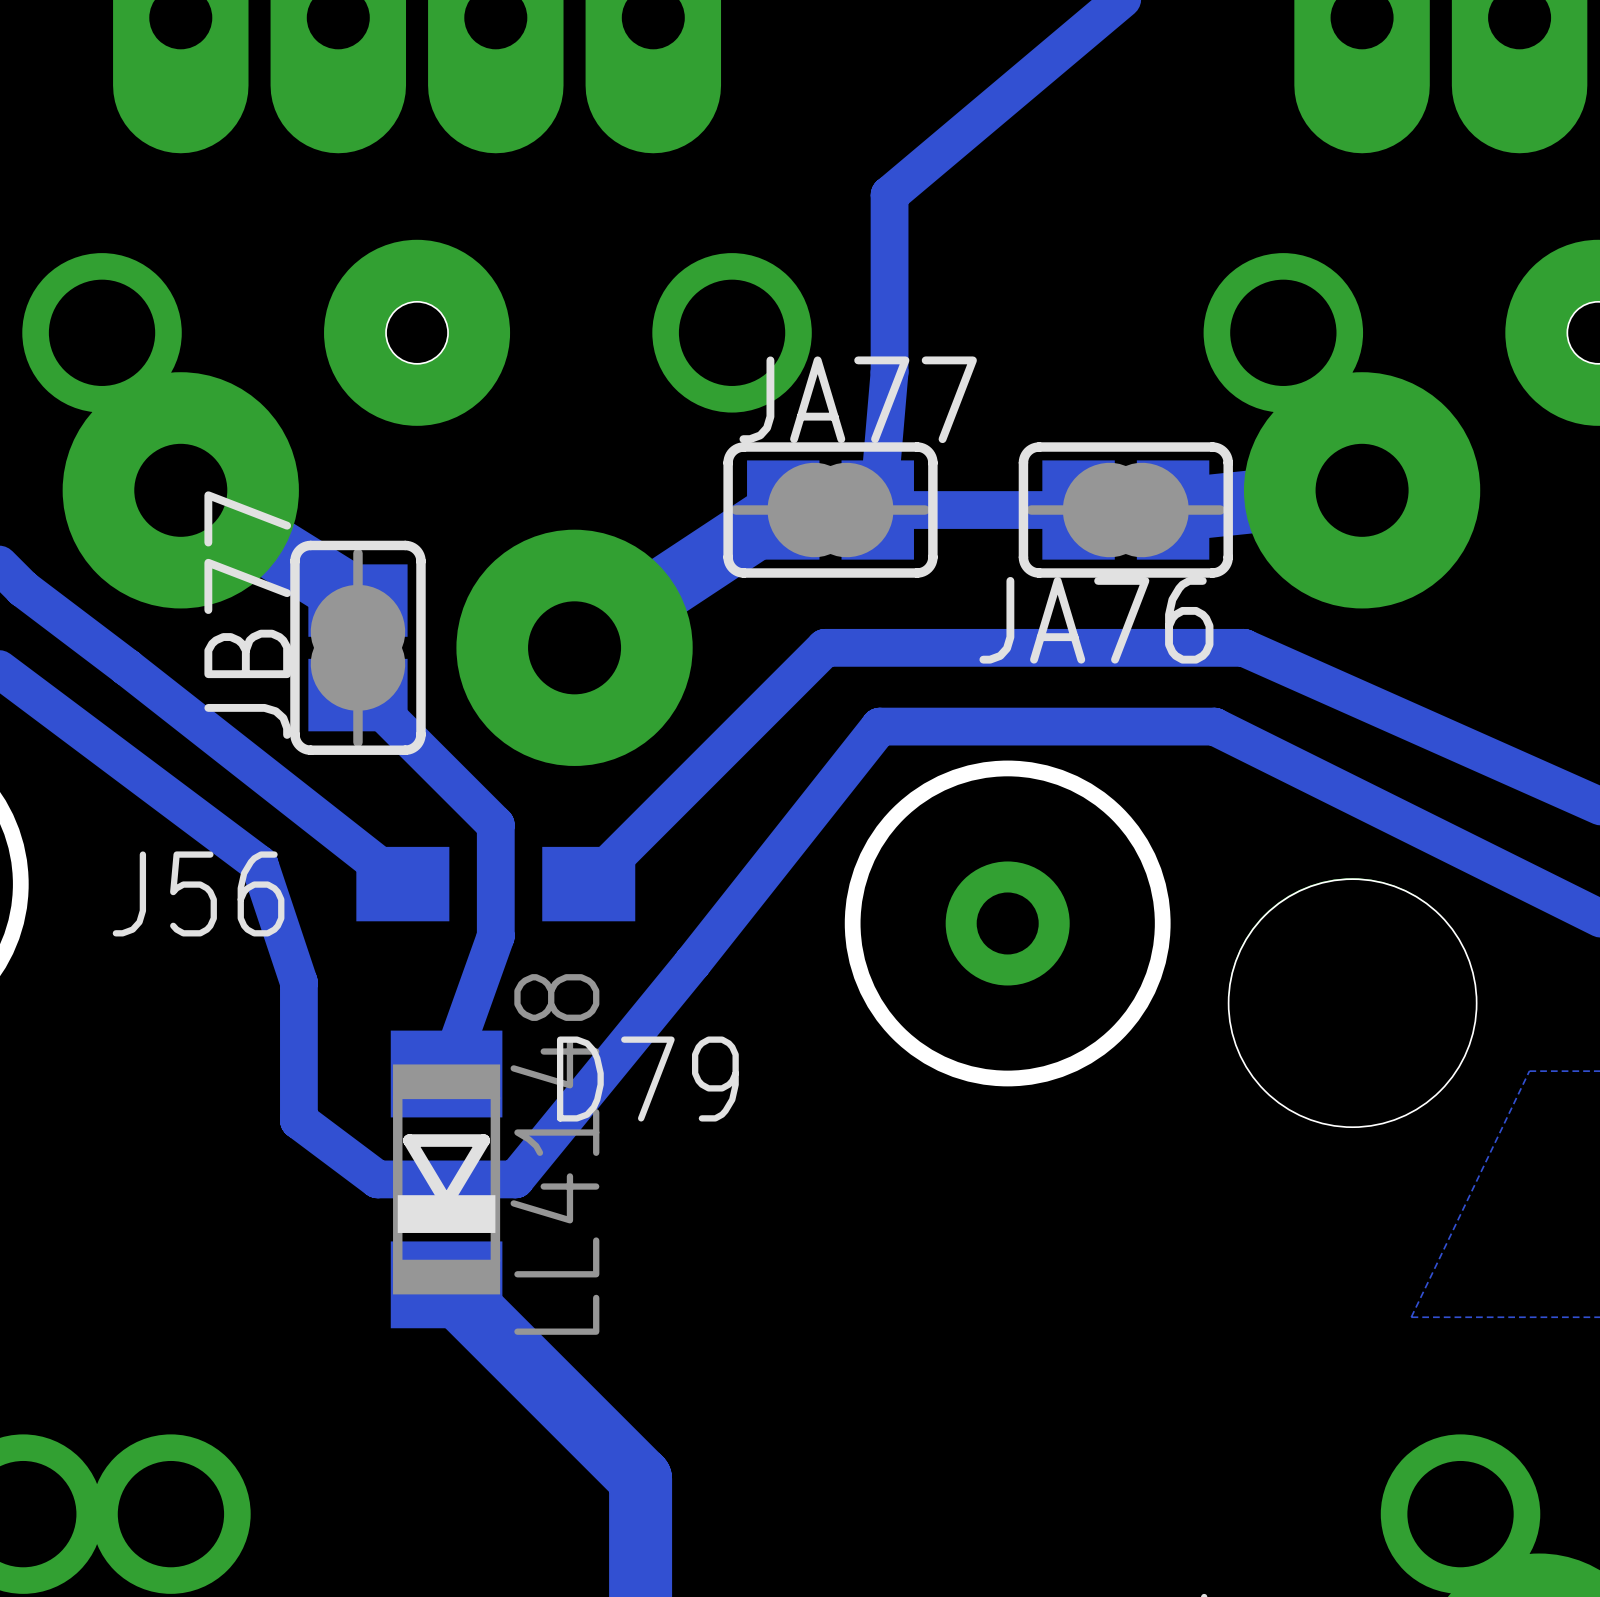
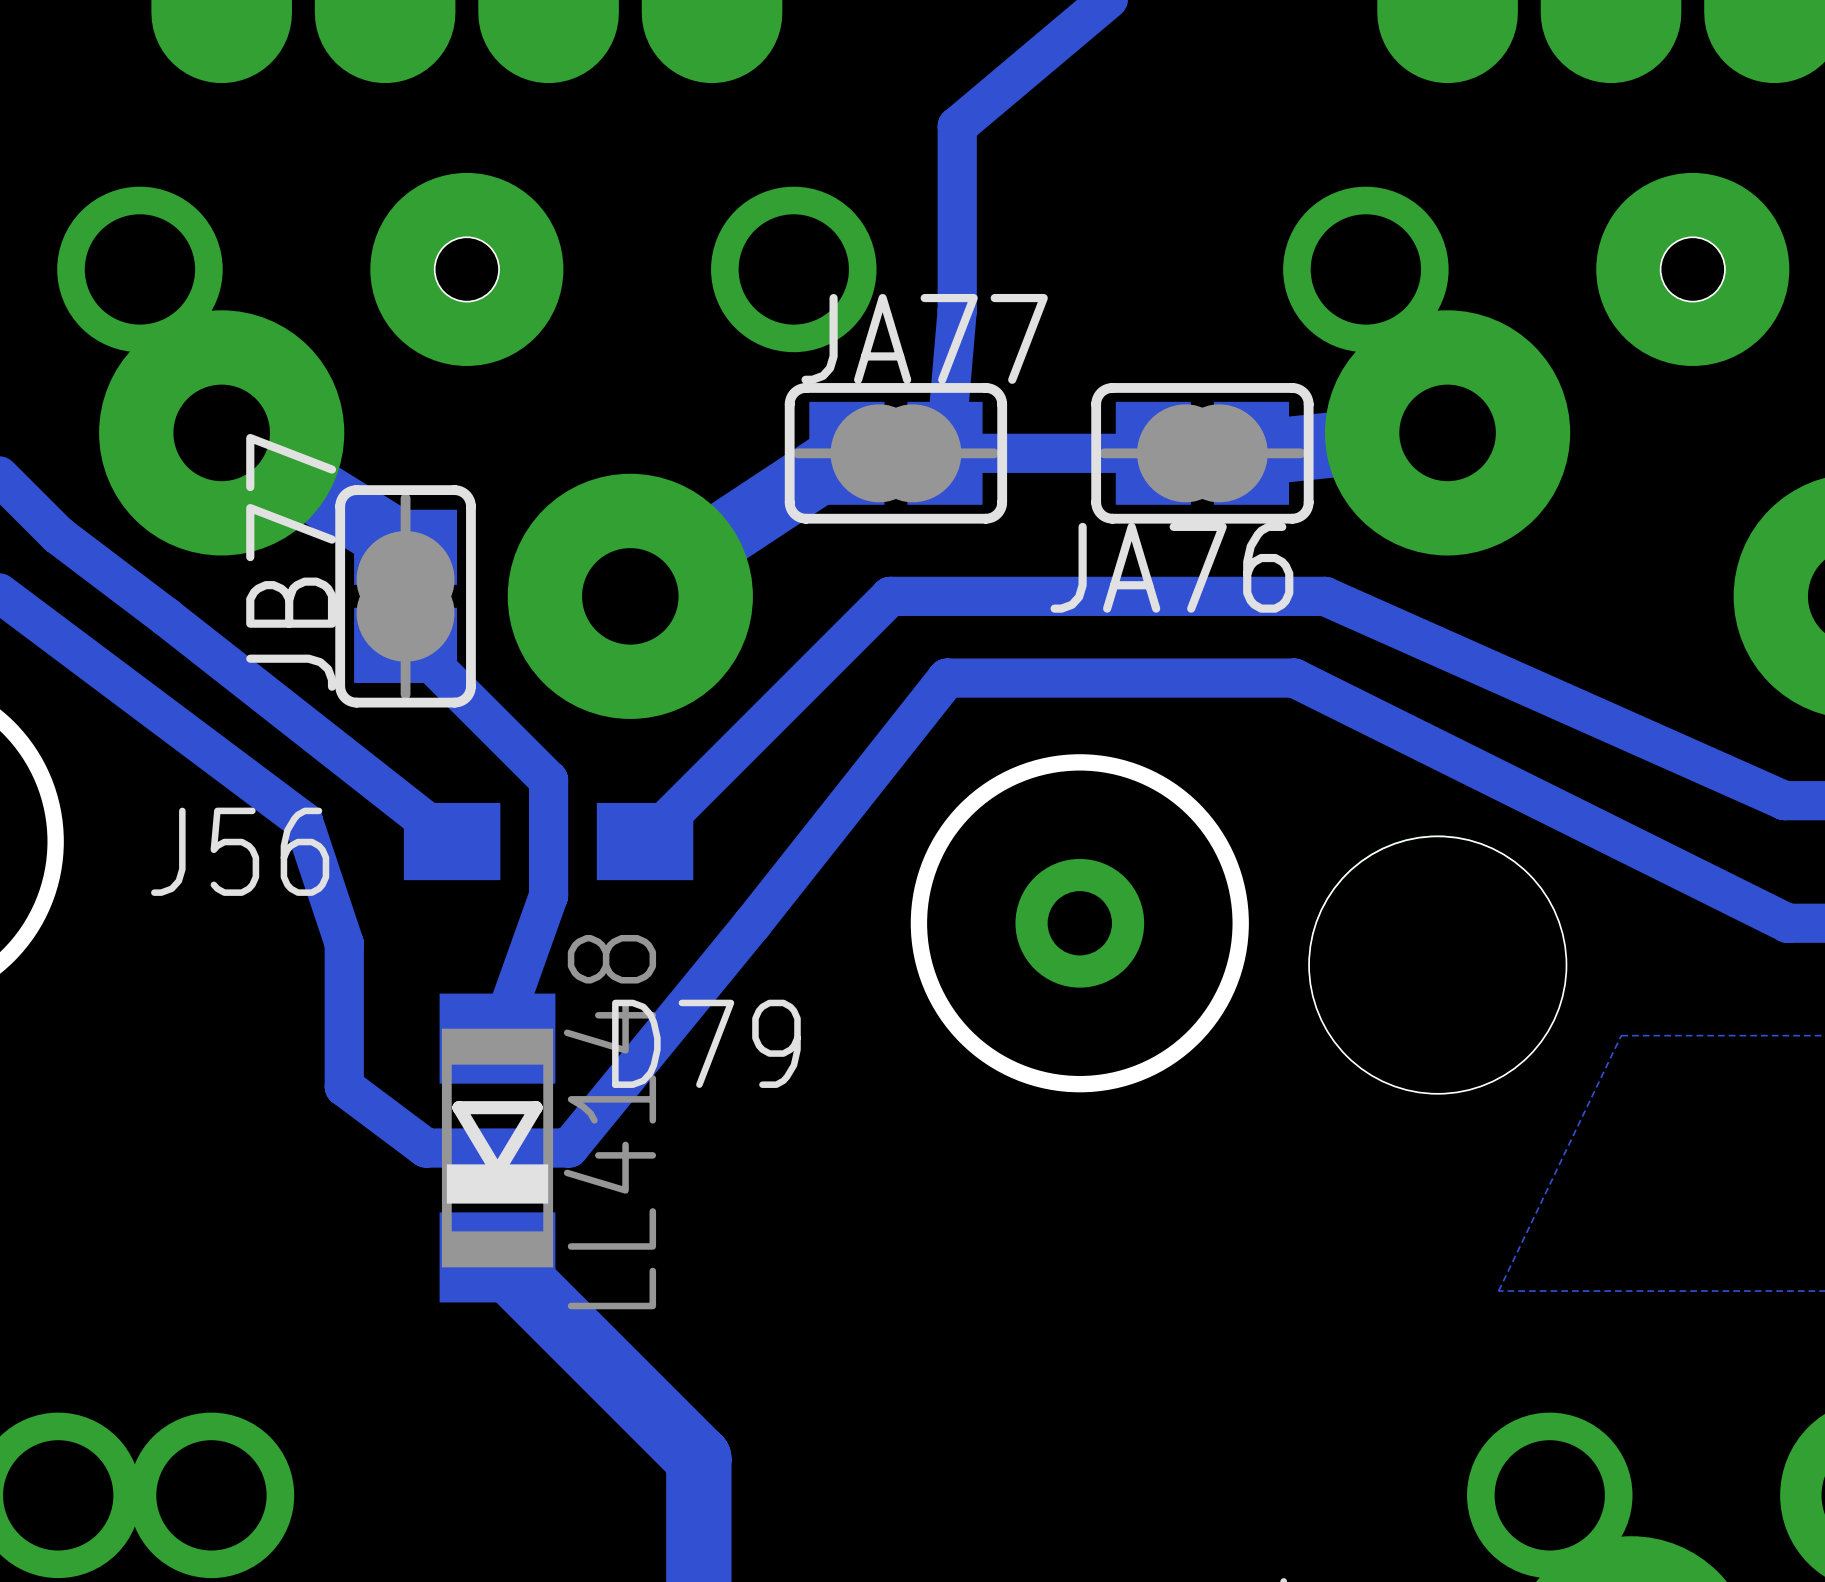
round board edge position: (1007, 923) -> (1079, 923)
via position: (1007, 923) -> (1079, 923)

